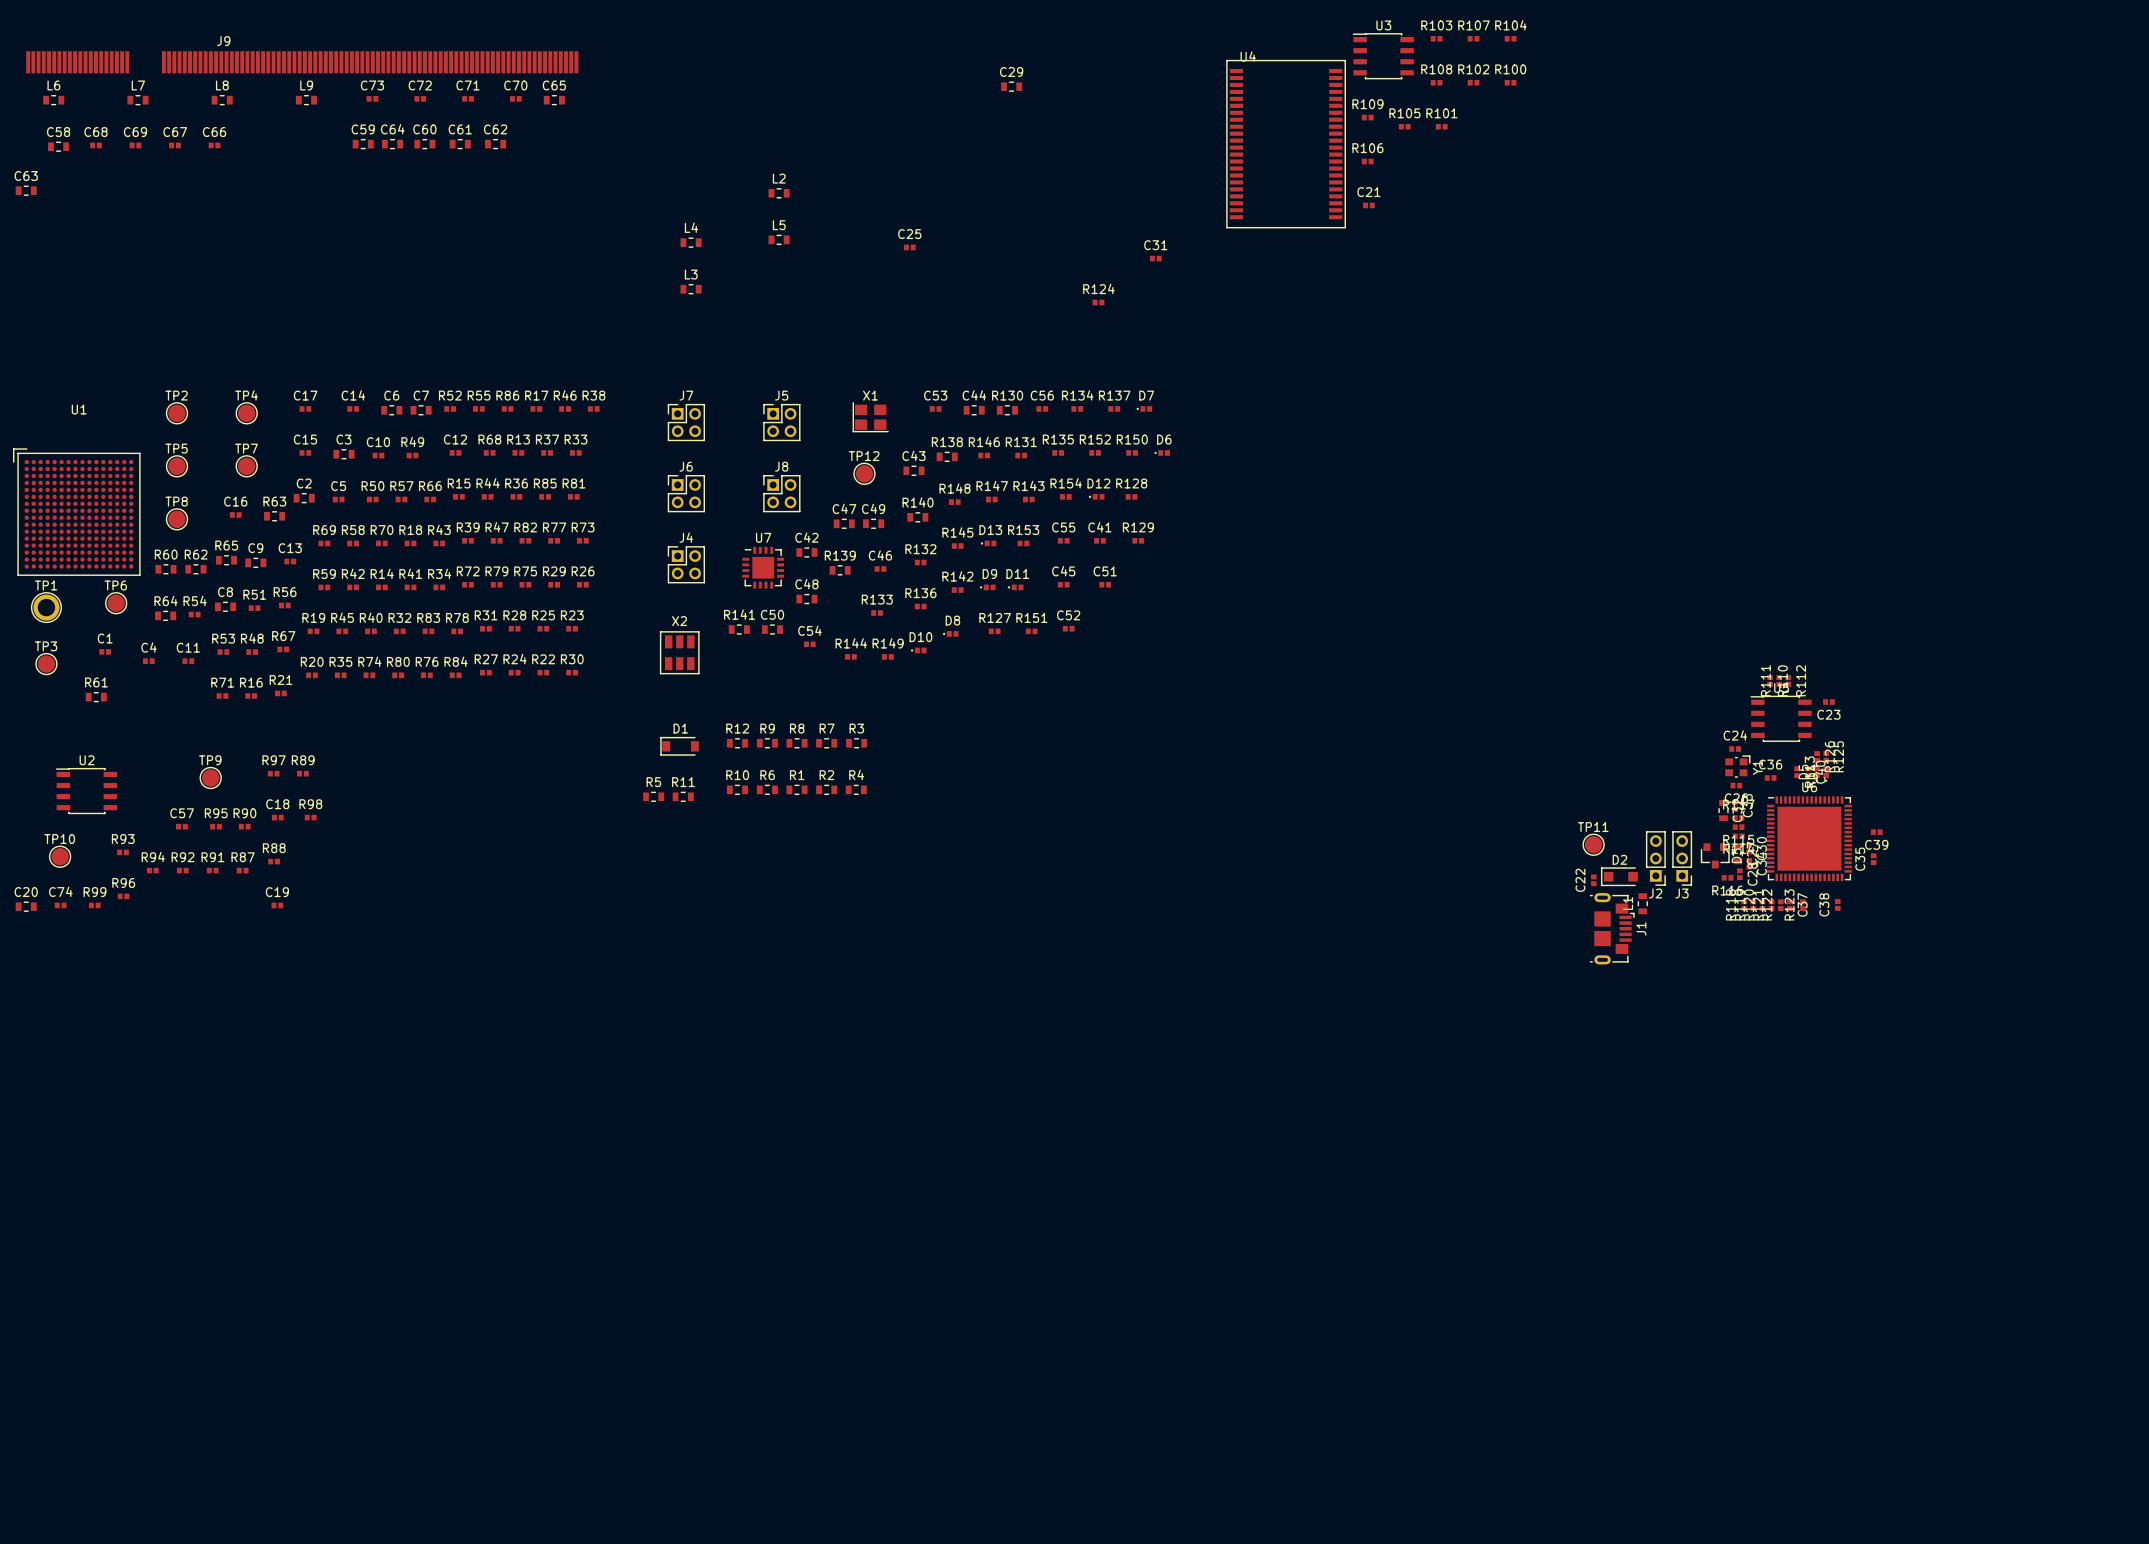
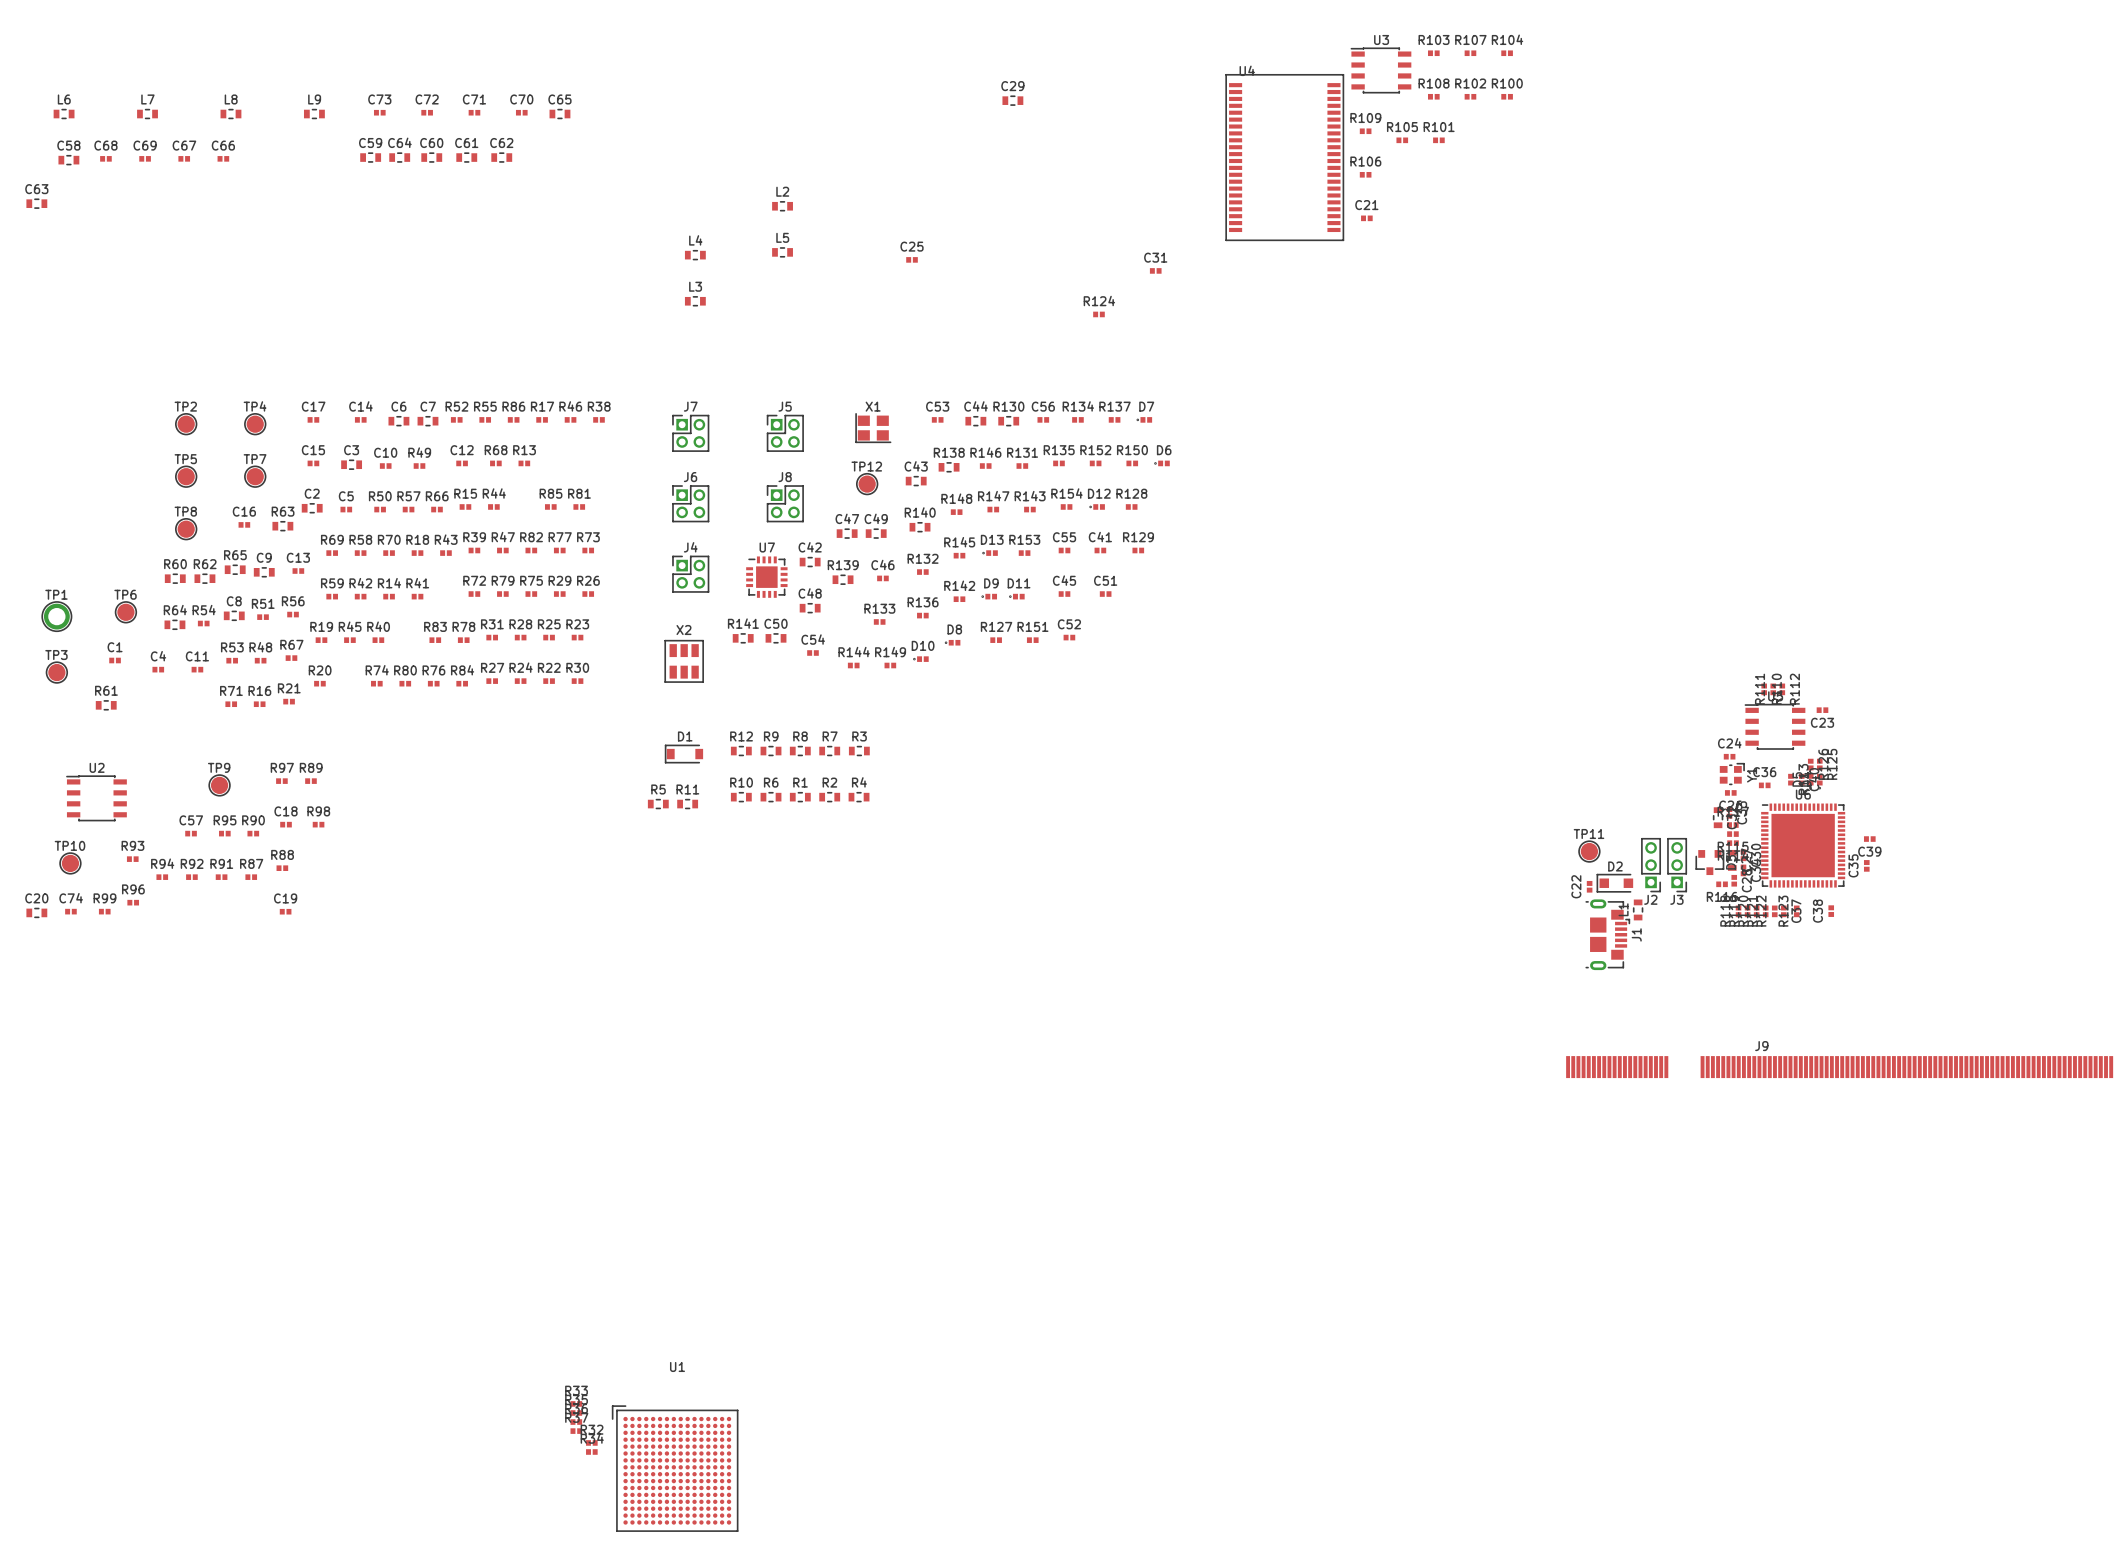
J9 position: (302, 62) -> (1839, 1067)
R37 position: (547, 452) -> (576, 1431)
R33 position: (575, 452) -> (576, 1403)
R36 position: (516, 496) -> (576, 1422)
U1 position: (76, 512) -> (675, 1468)
R34 position: (439, 587) -> (591, 1452)
R32 position: (399, 631) -> (591, 1442)
R35 position: (340, 675) -> (576, 1412)

